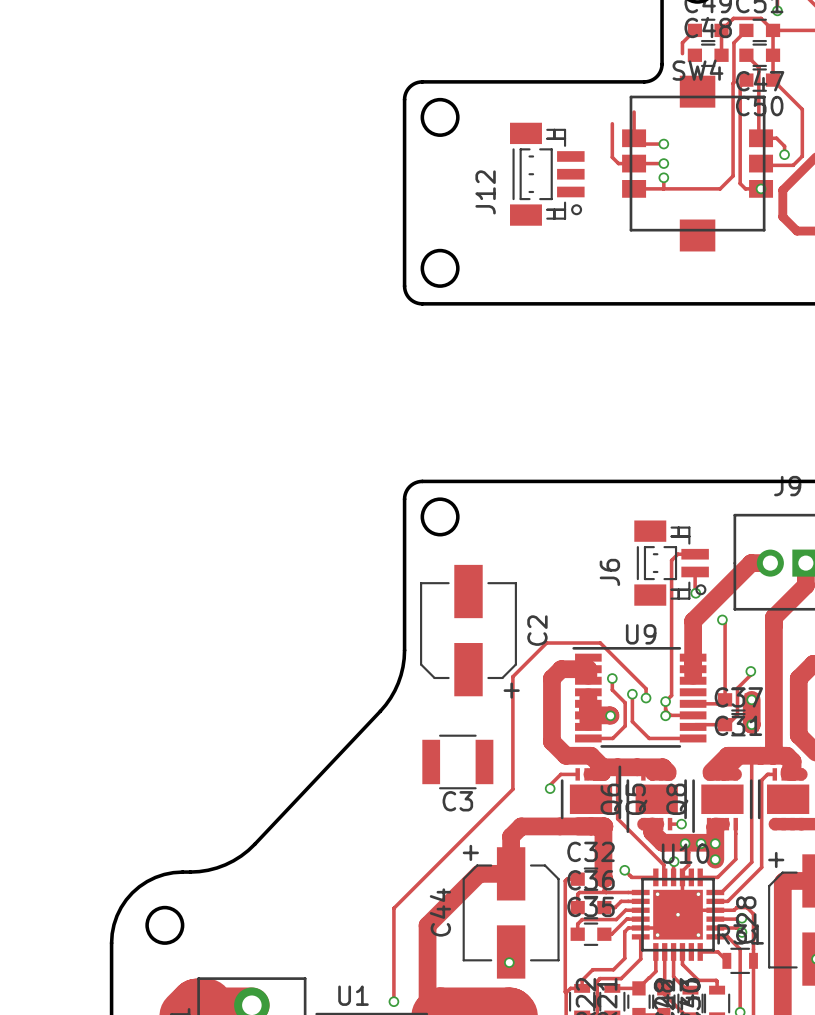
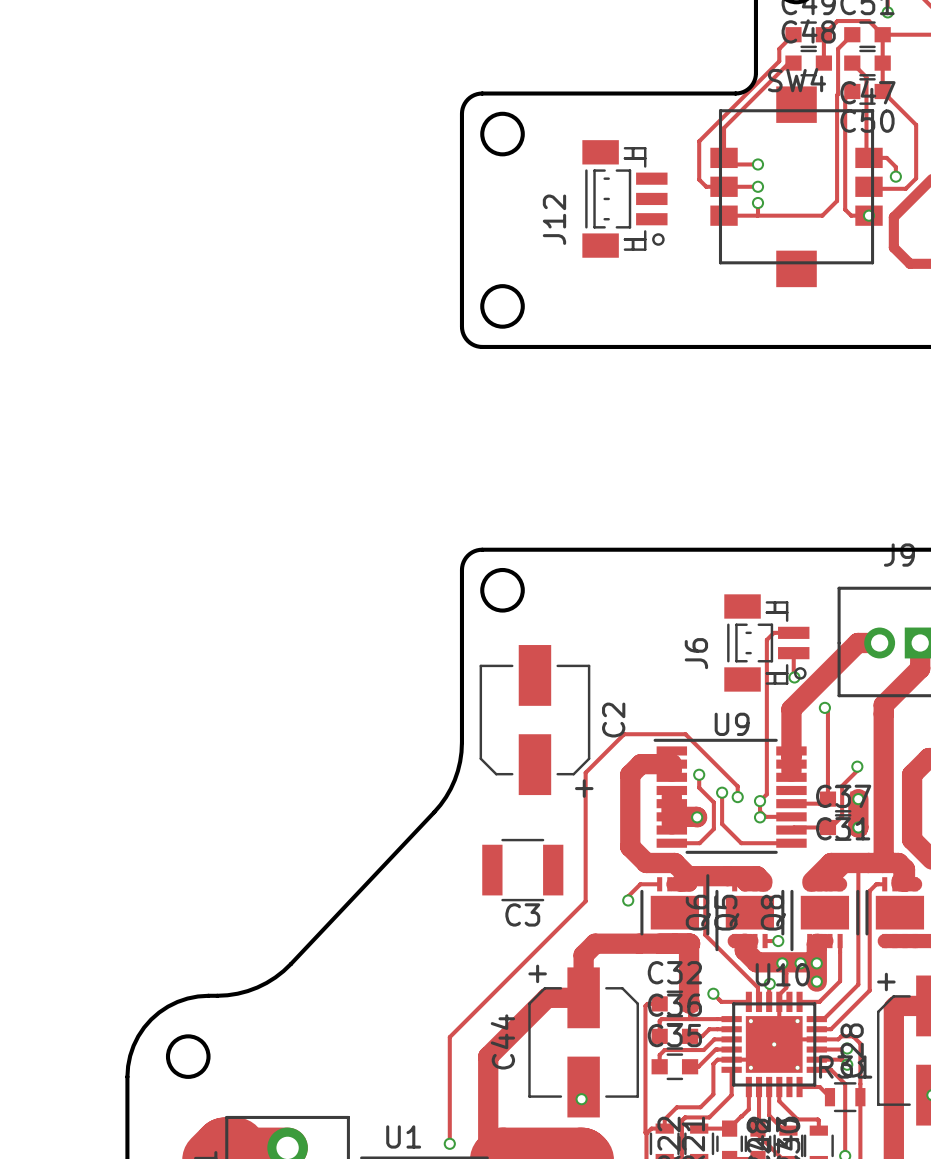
track: none -> (779, 61) (699, 141)
track: none -> (788, 63) (724, 127)

